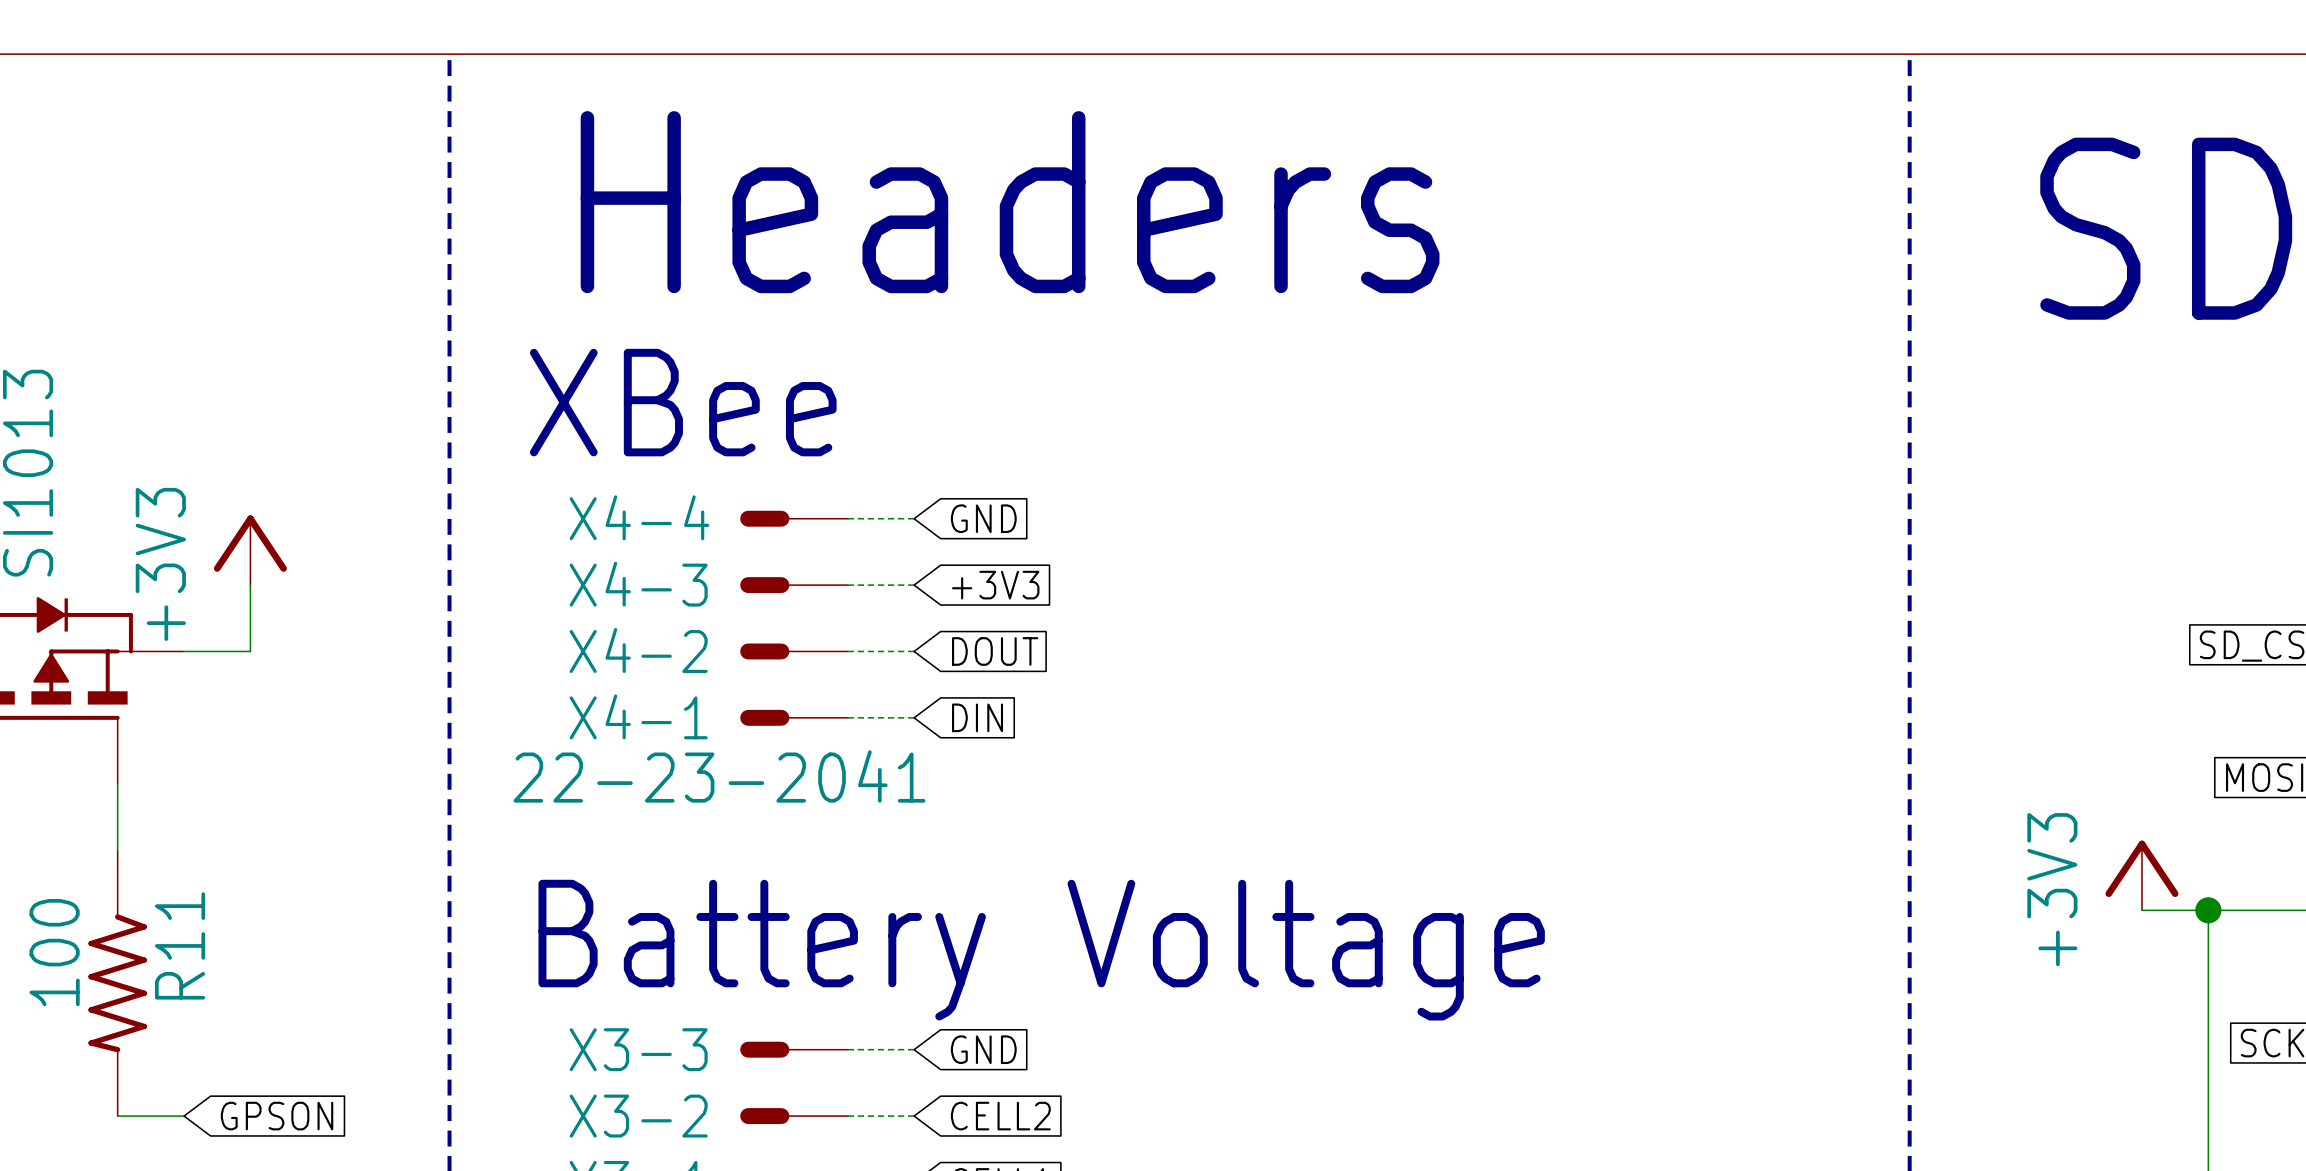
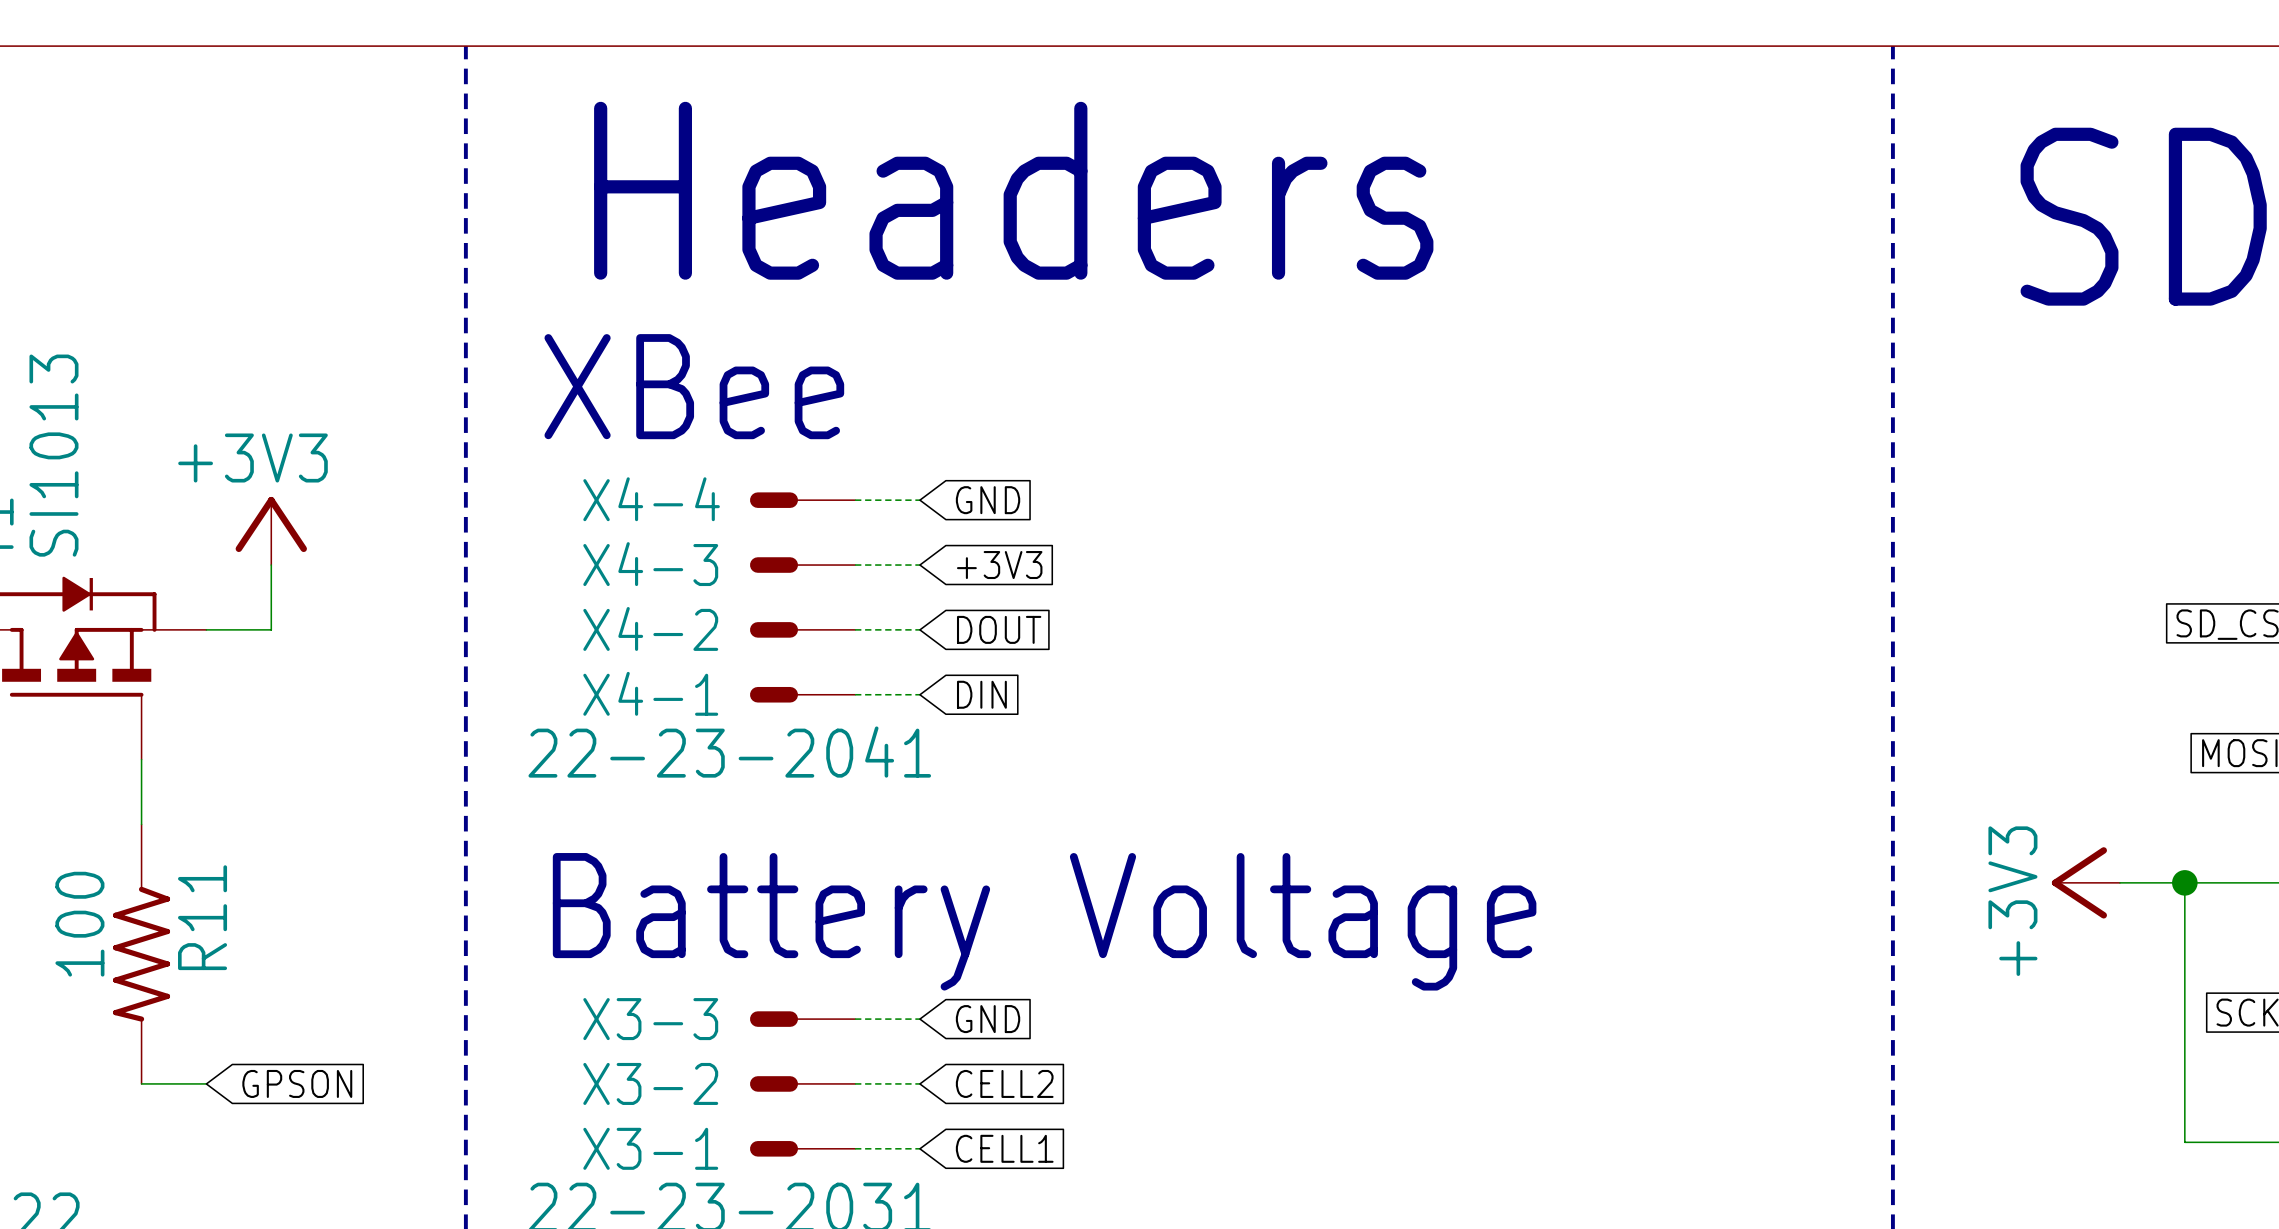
power symbol text rotation: 0° (160, 564) -> 90° clockwise (253, 457)
power symbol rotation: 0° (2141, 868) -> 90° counterclockwise (2079, 882)
power symbol position: +3V3 (2141, 875) -> +3V3 (2085, 882)

